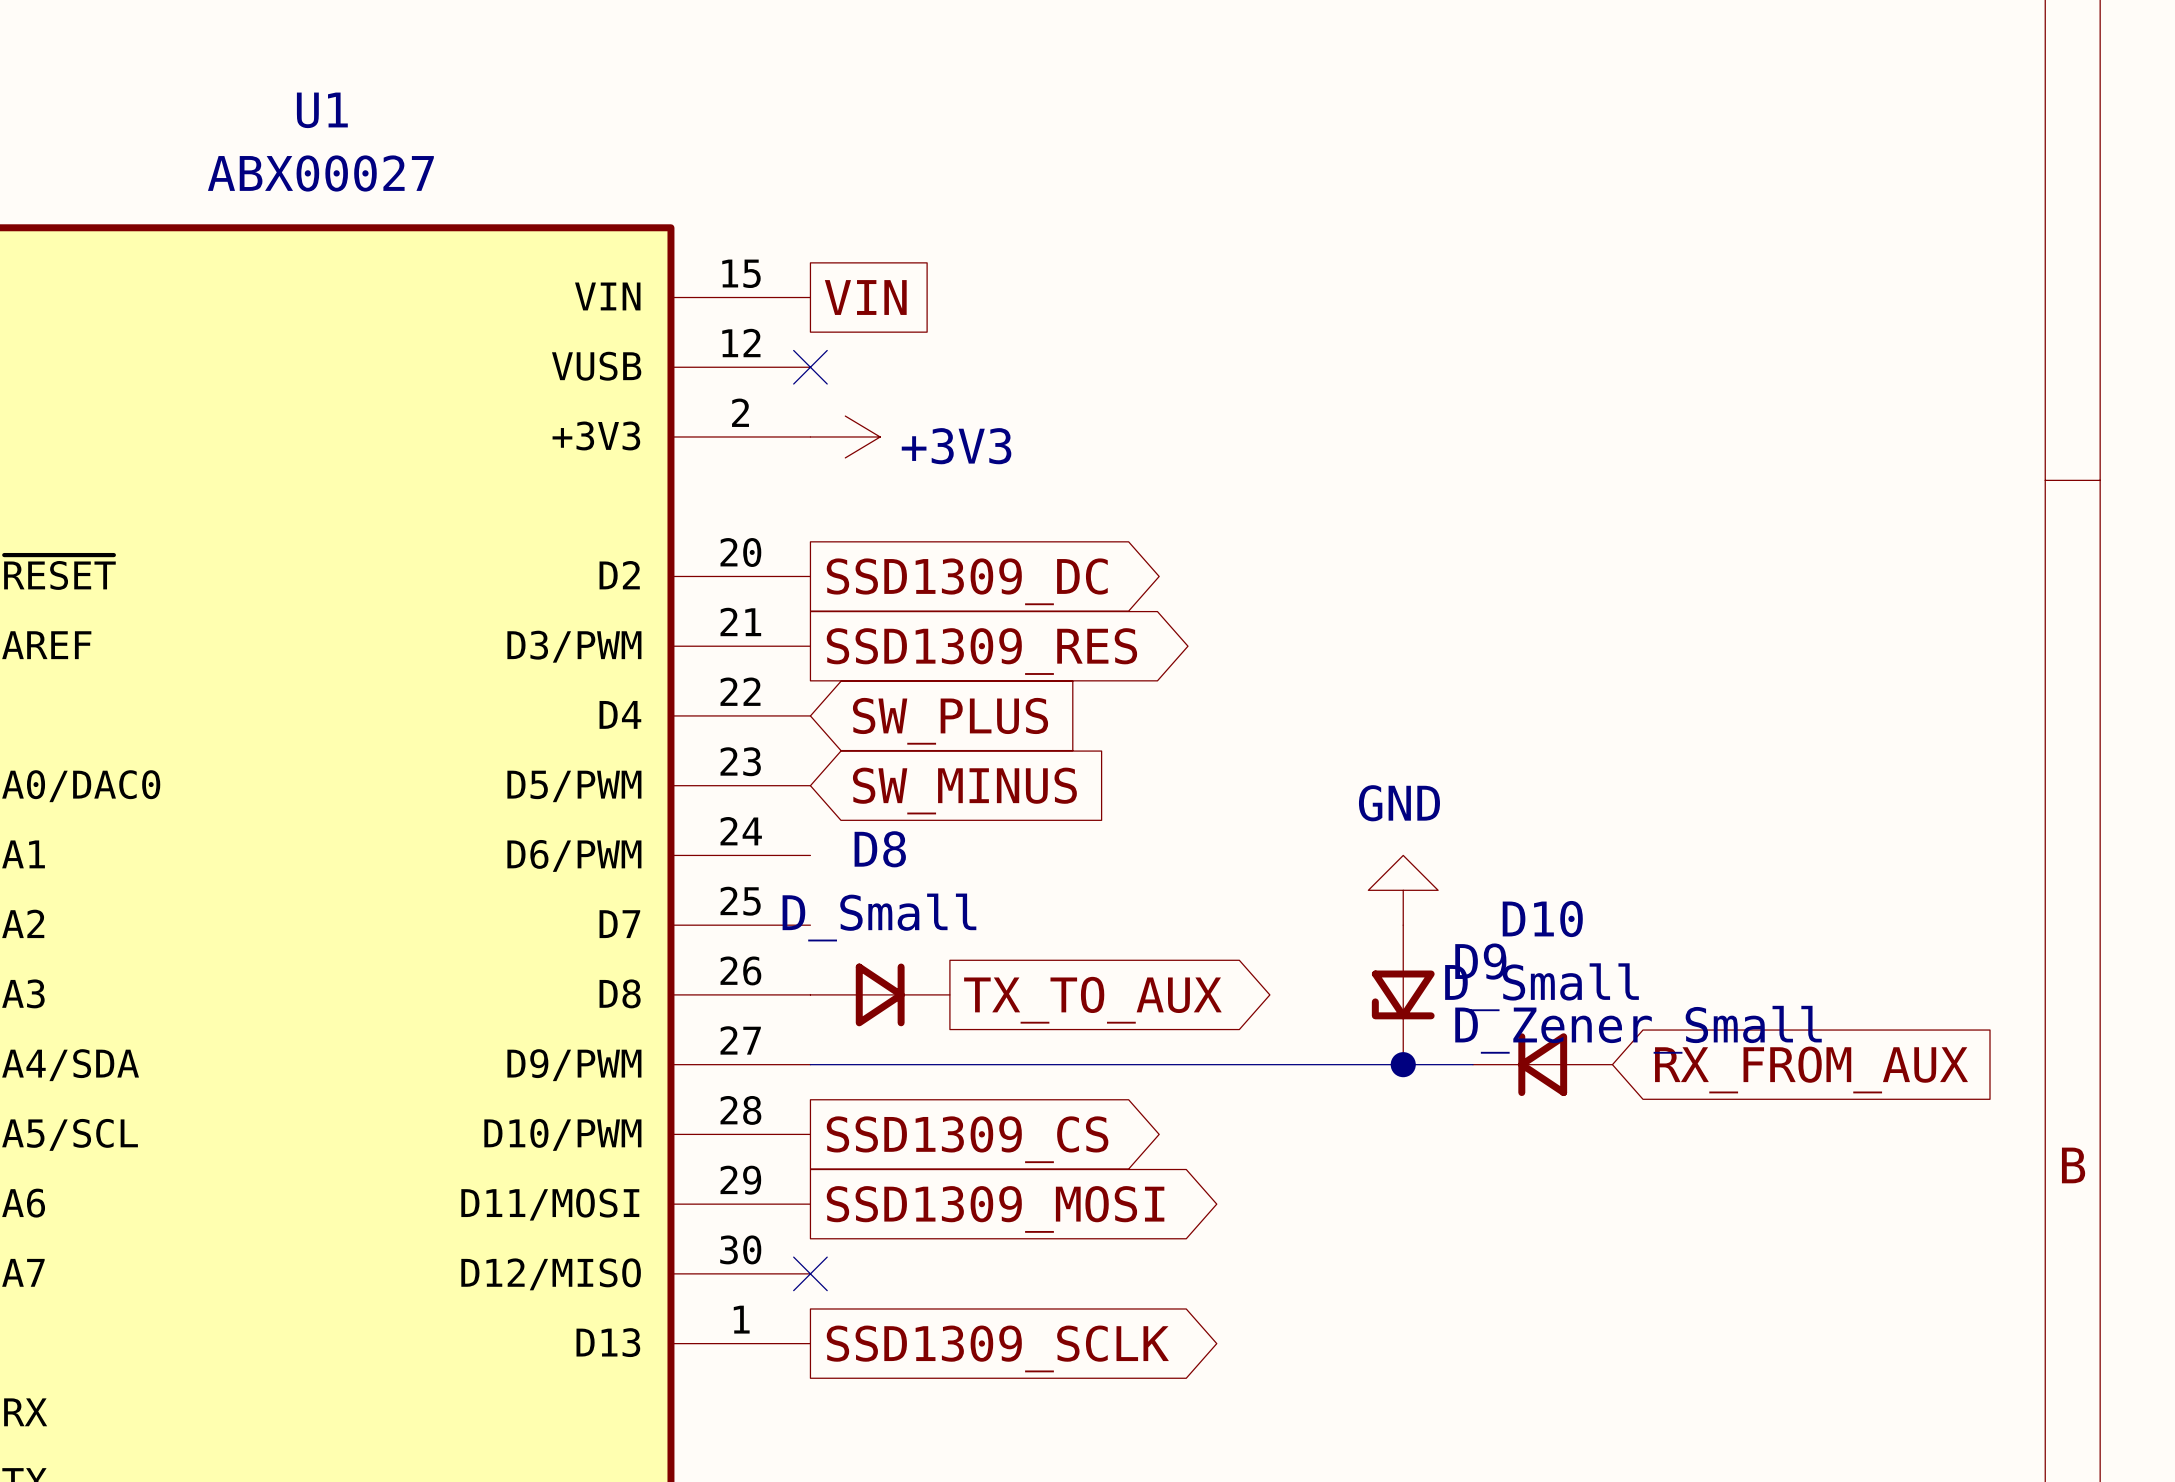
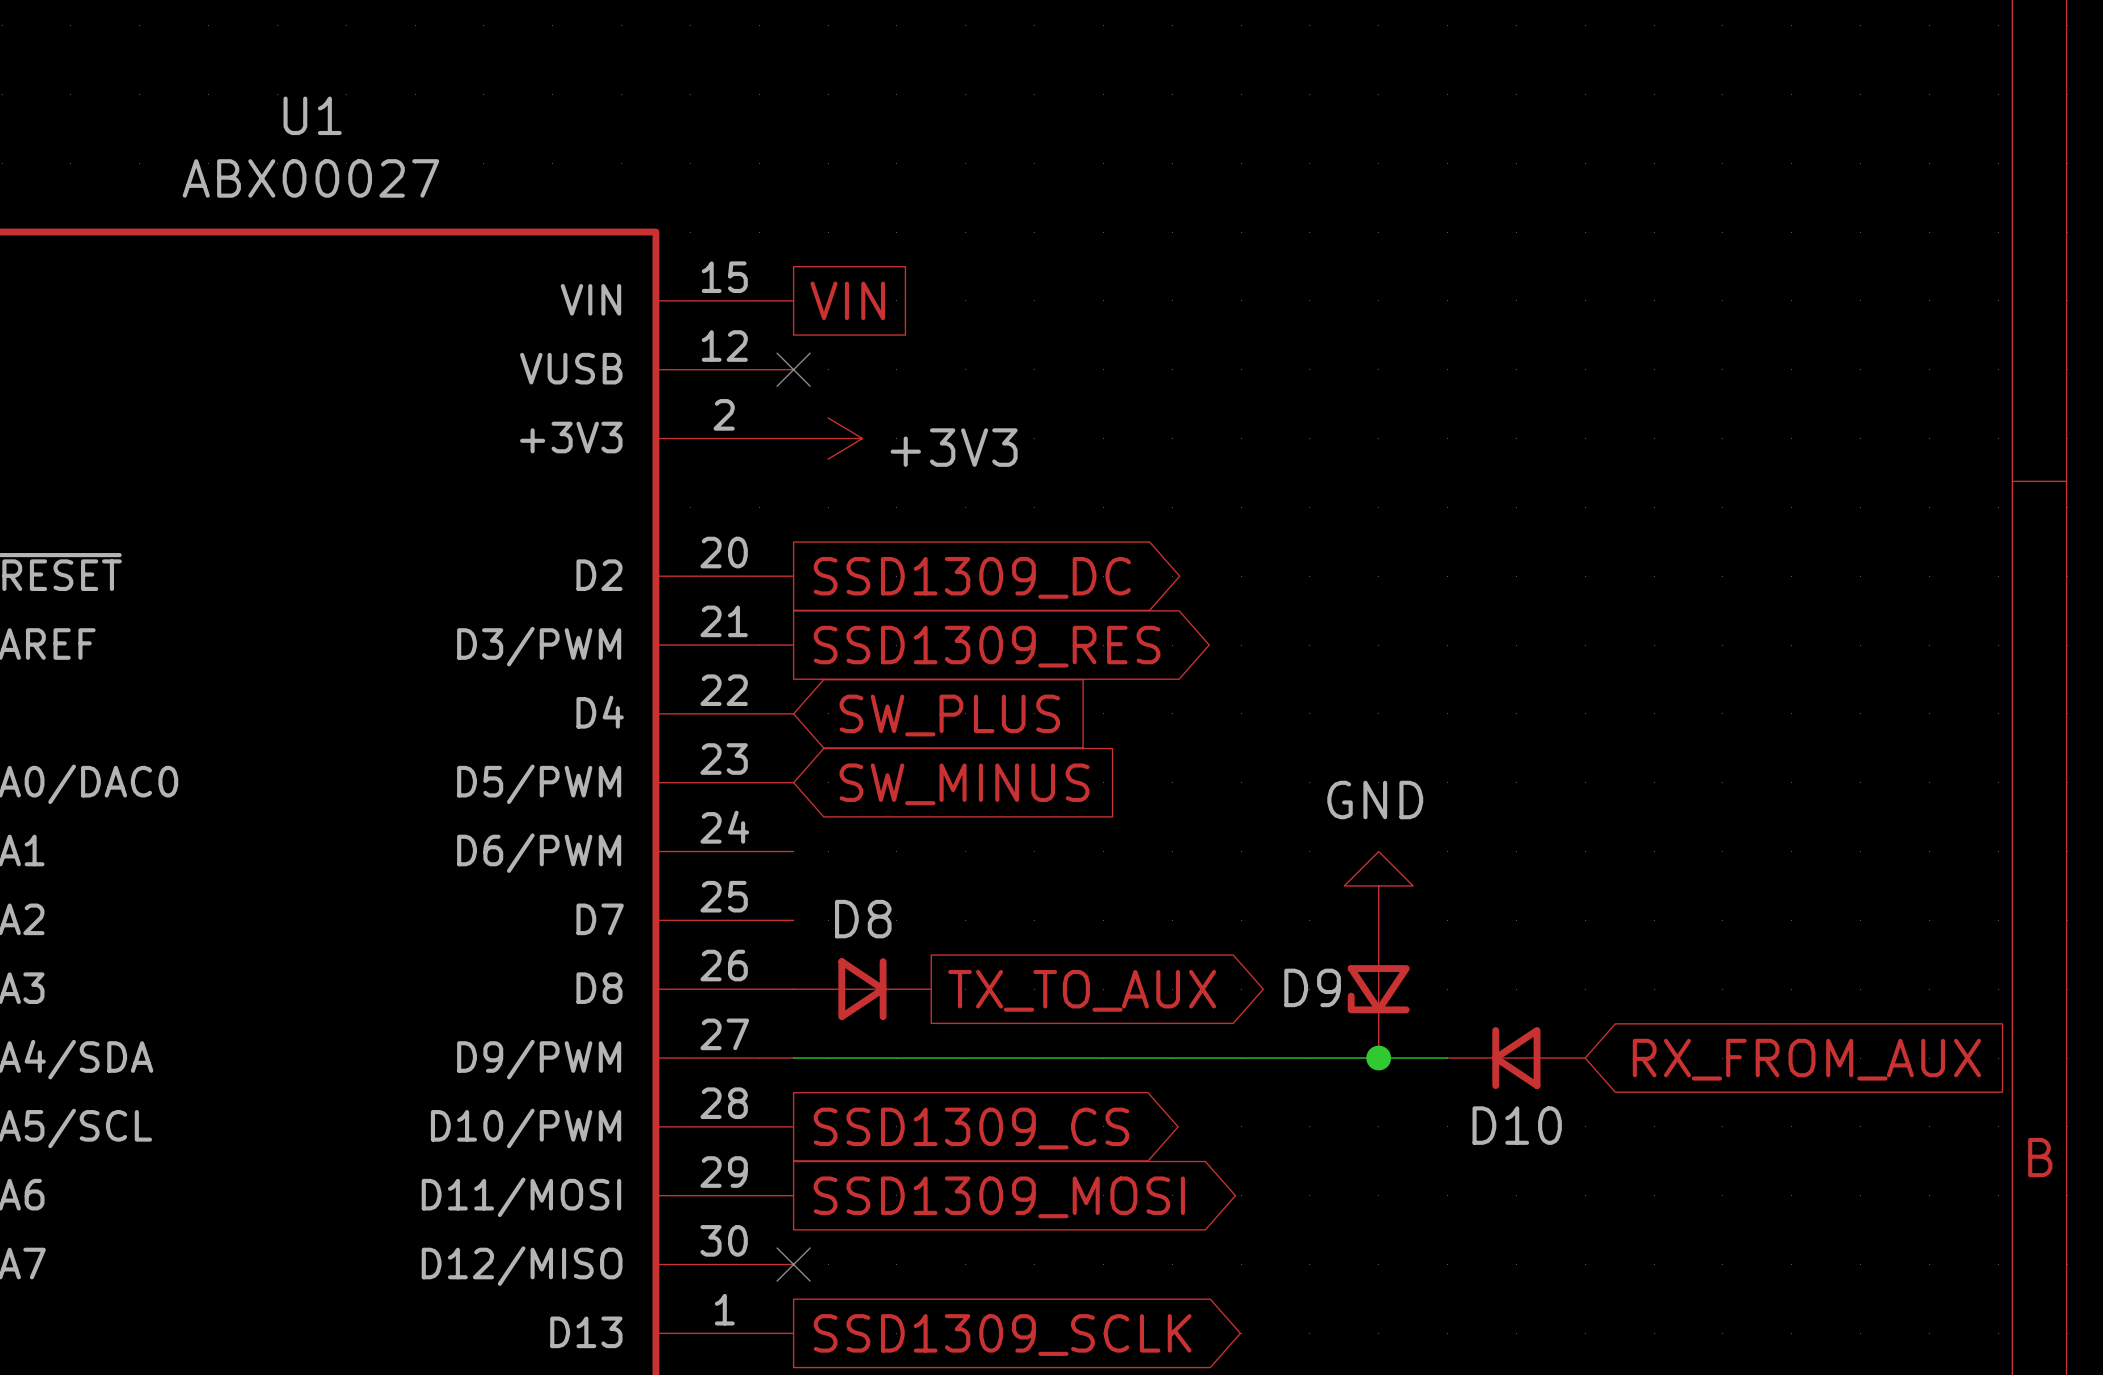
D8 name position: D8 (880, 849) -> D8 (863, 919)
D8 value: D_Small (879, 917) -> none
D10 name position: D10 (1542, 919) -> D10 (1517, 1125)
D9 name position: D9 (1480, 961) -> D9 (1312, 987)
D10 value: D_Small (1542, 987) -> none
D9 value: D_Zener_Small (1638, 1029) -> none

